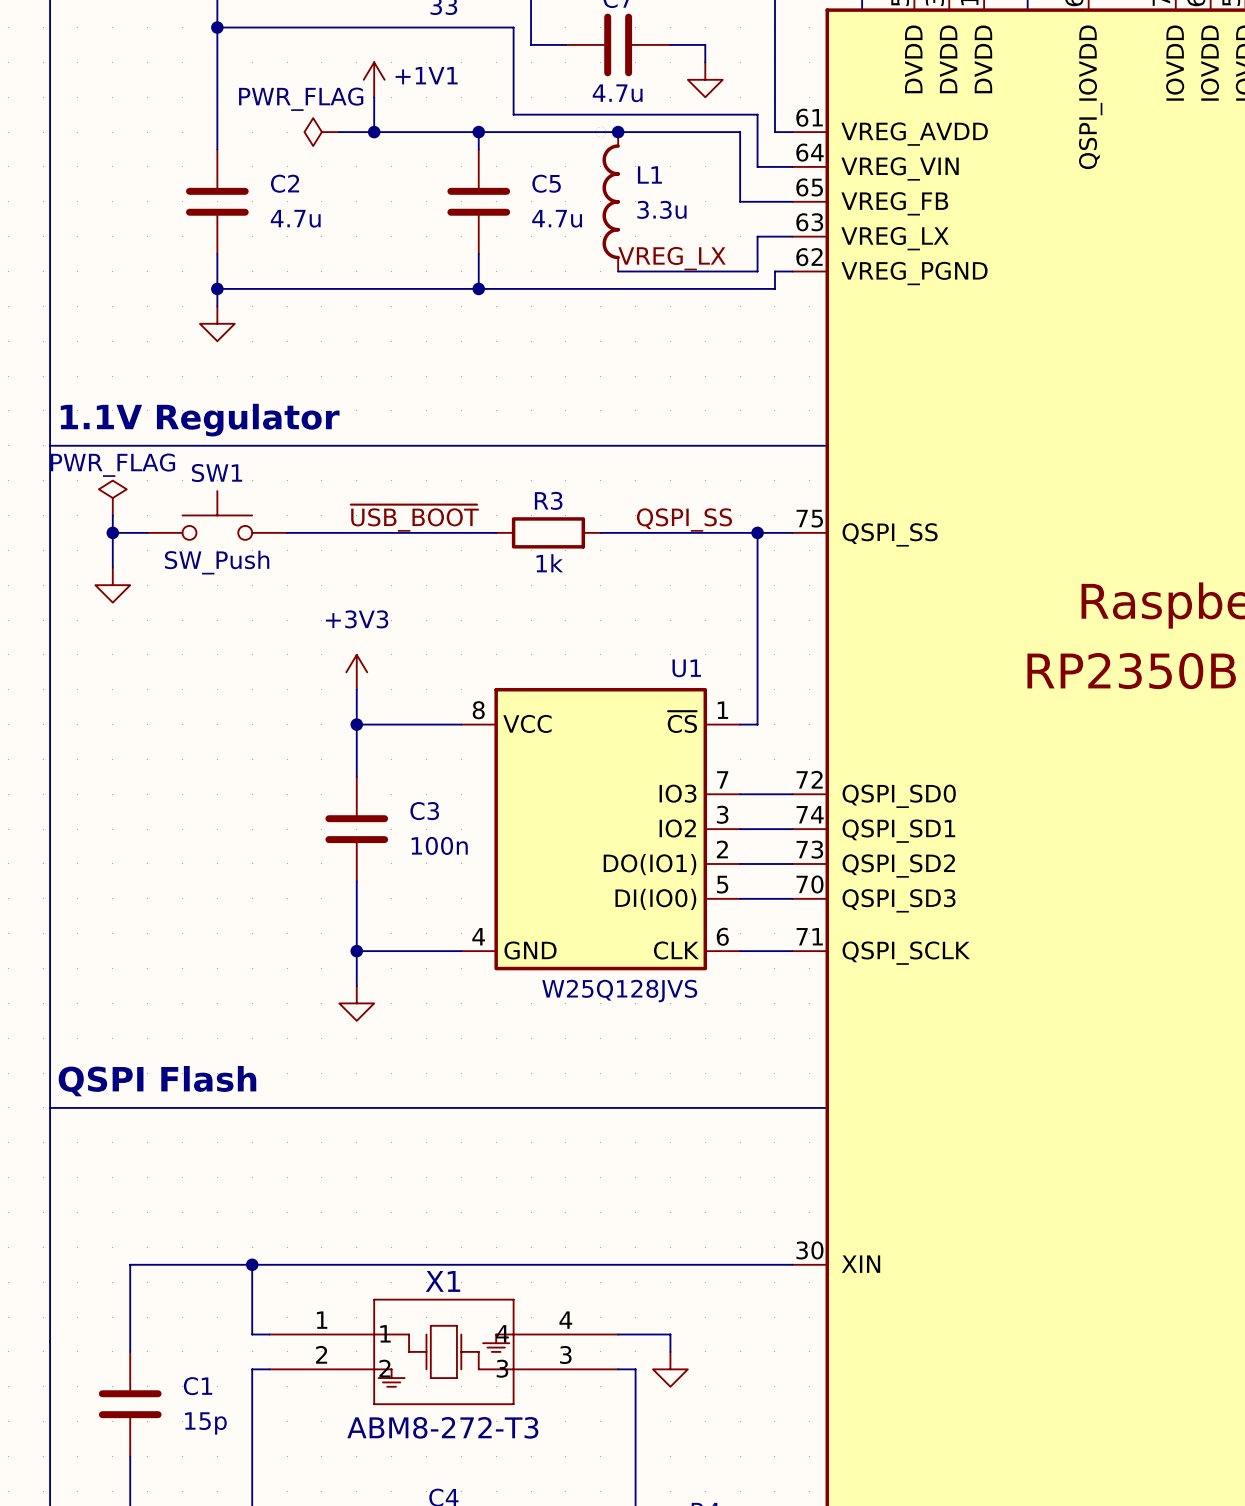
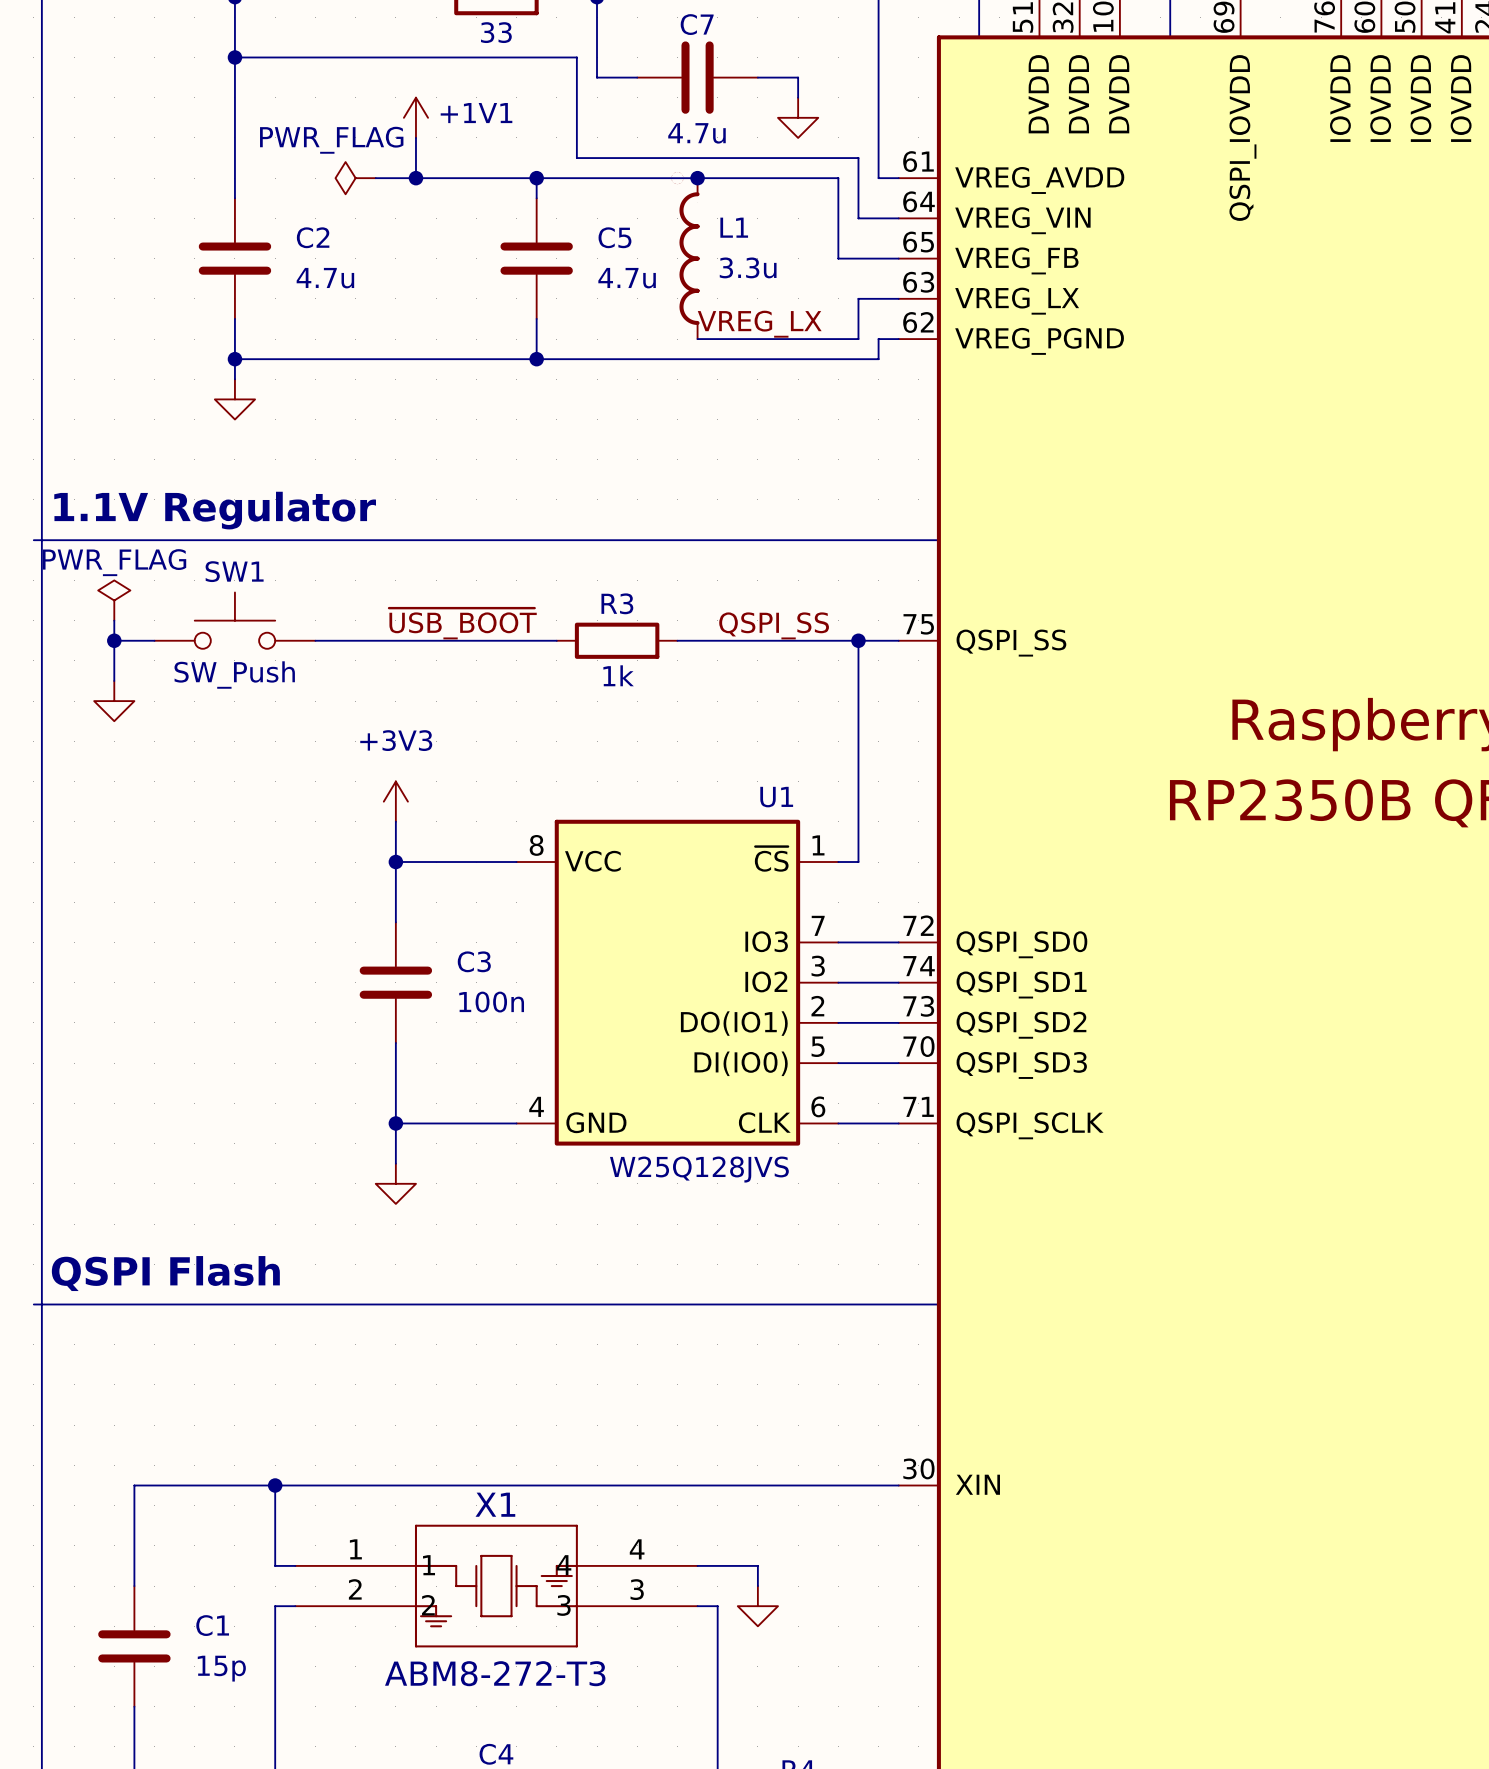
line: none -> (33, 540) (41, 540)
line: none -> (33, 1304) (41, 1304)

